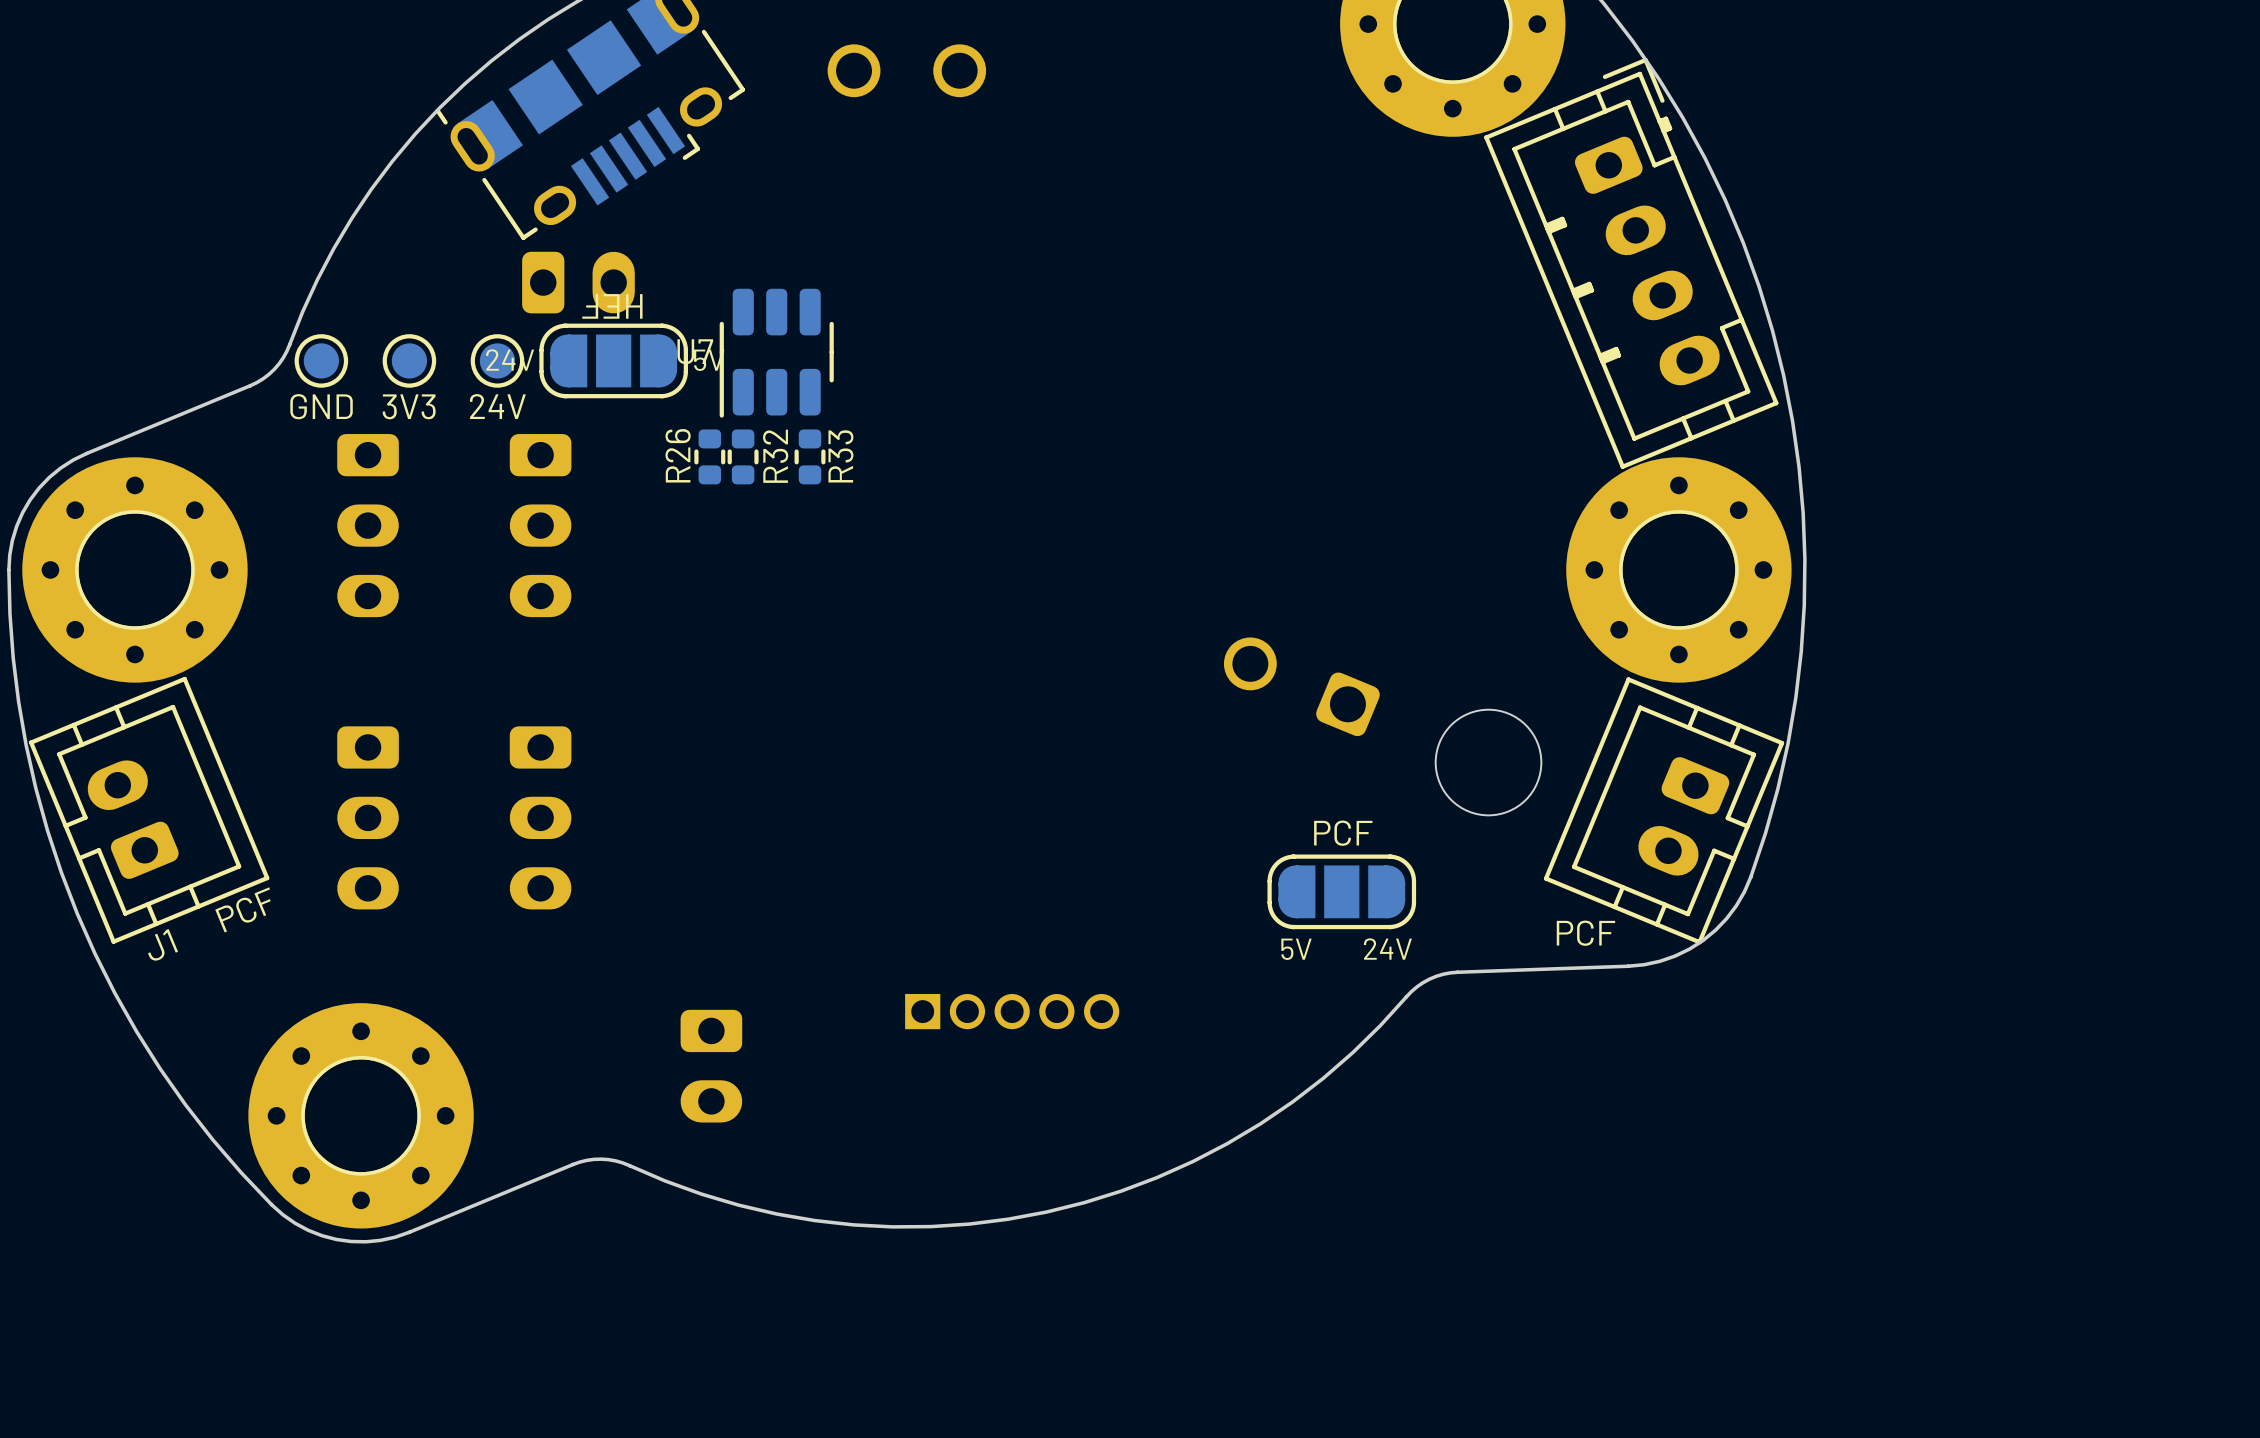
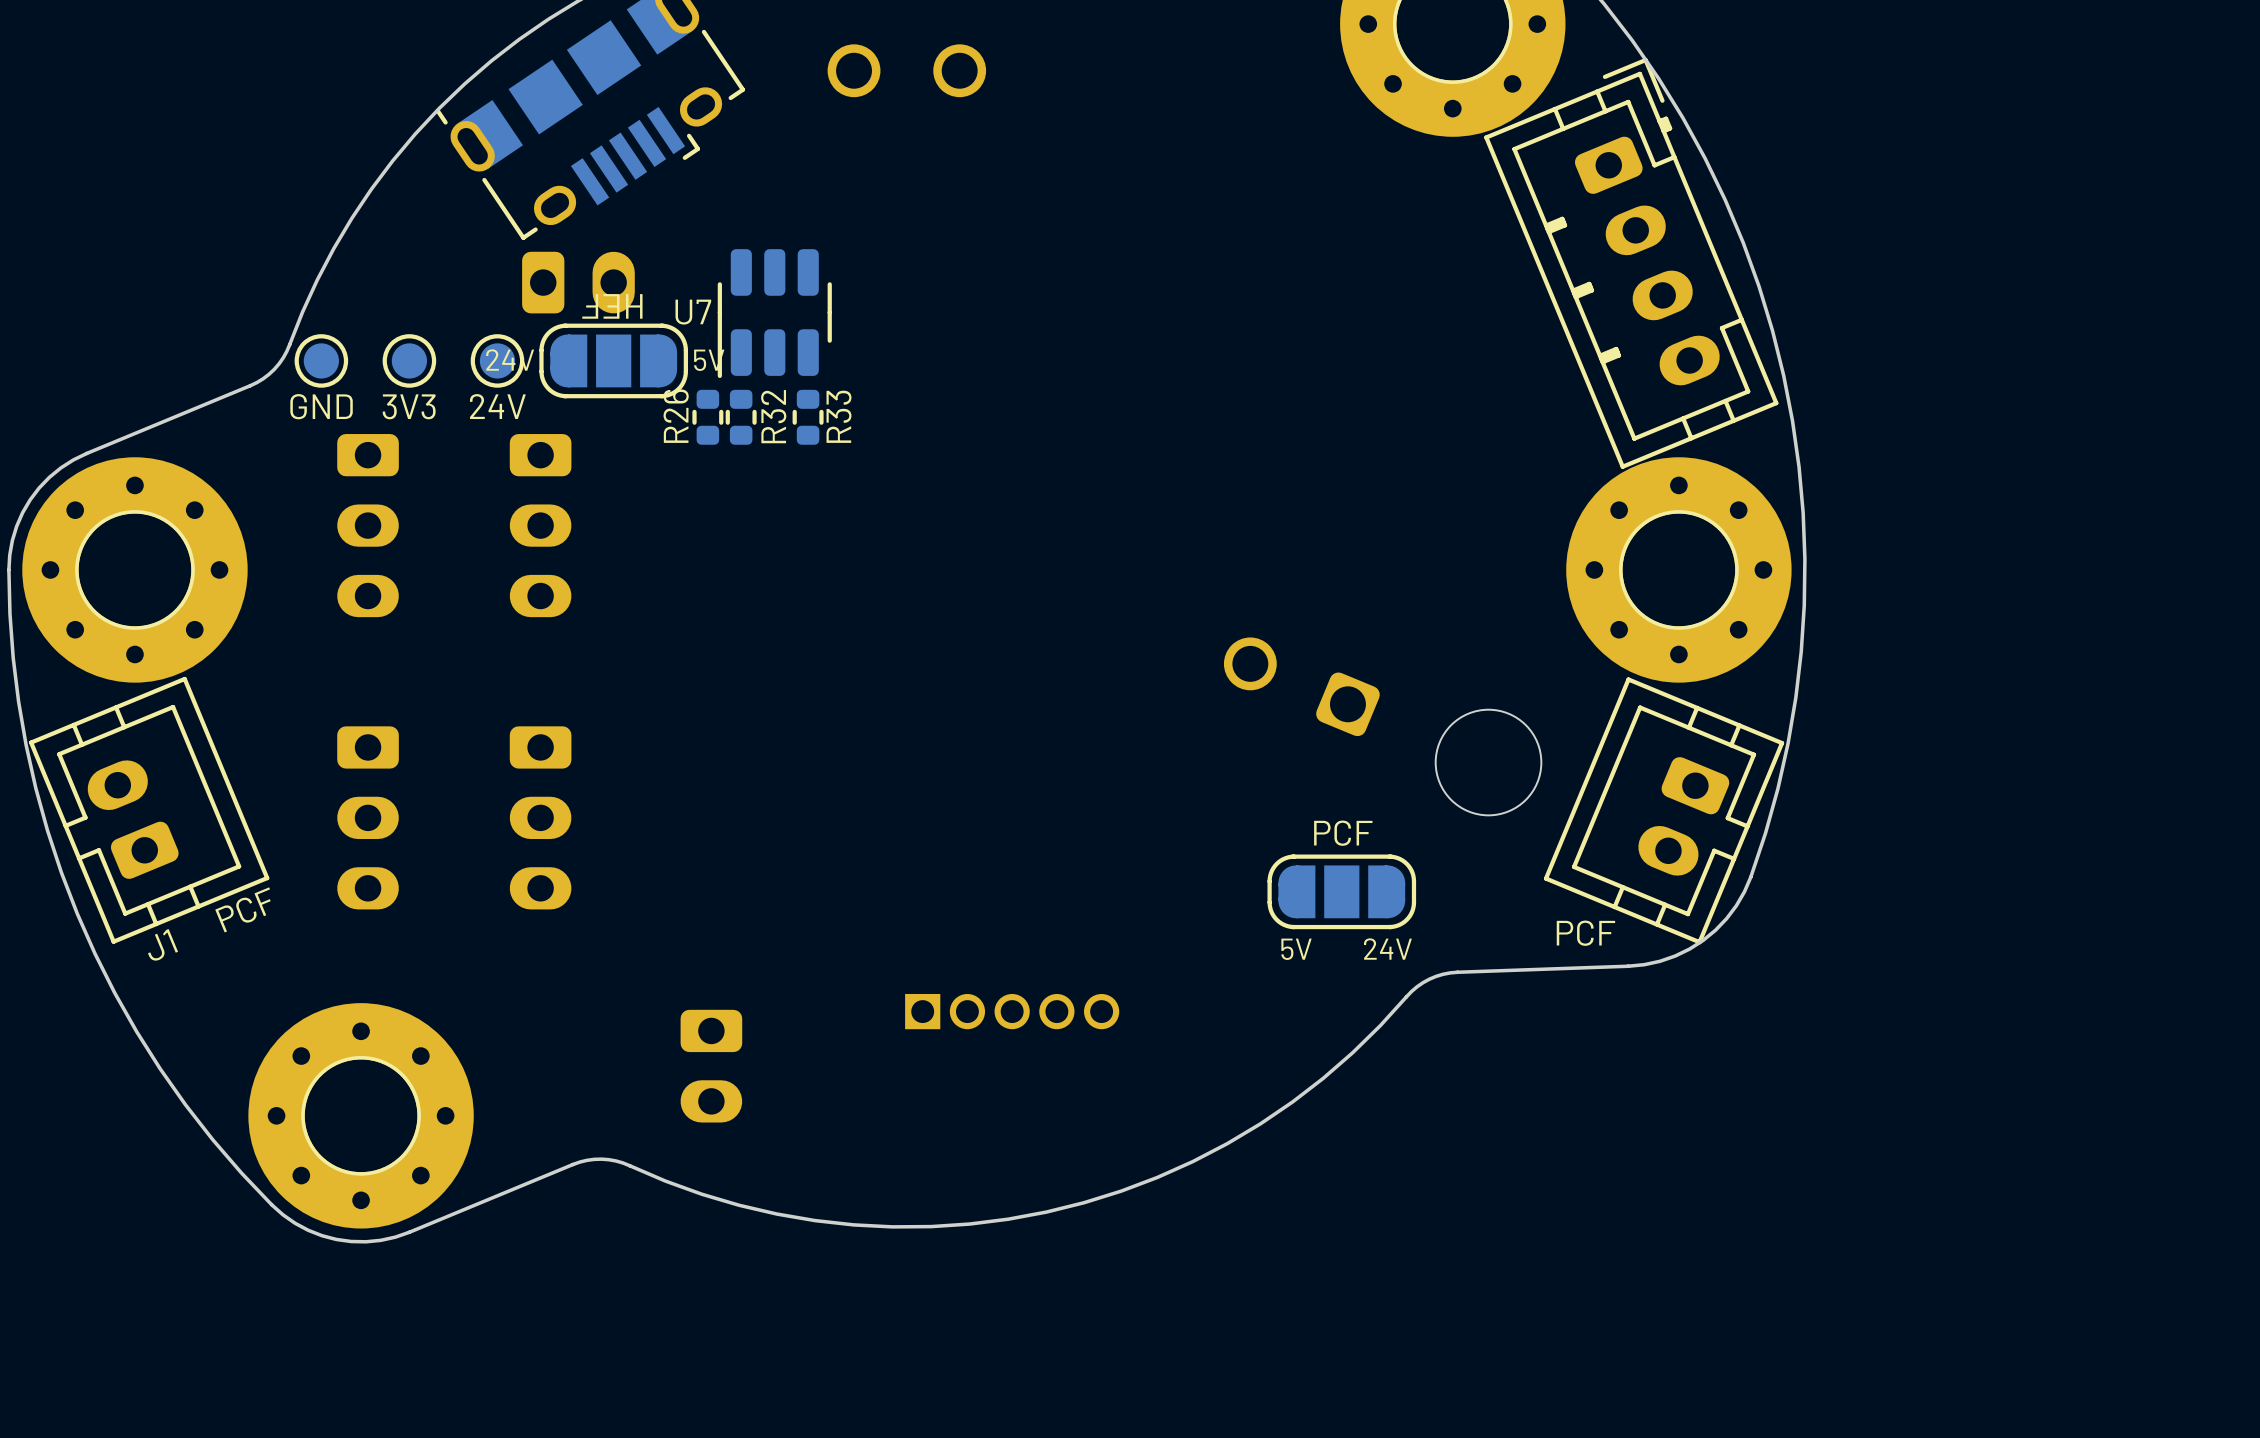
U7 position: (776, 353) -> (774, 313)
R26 position: (709, 456) -> (707, 417)
R32 position: (743, 456) -> (741, 417)
R33 position: (810, 456) -> (808, 417)

